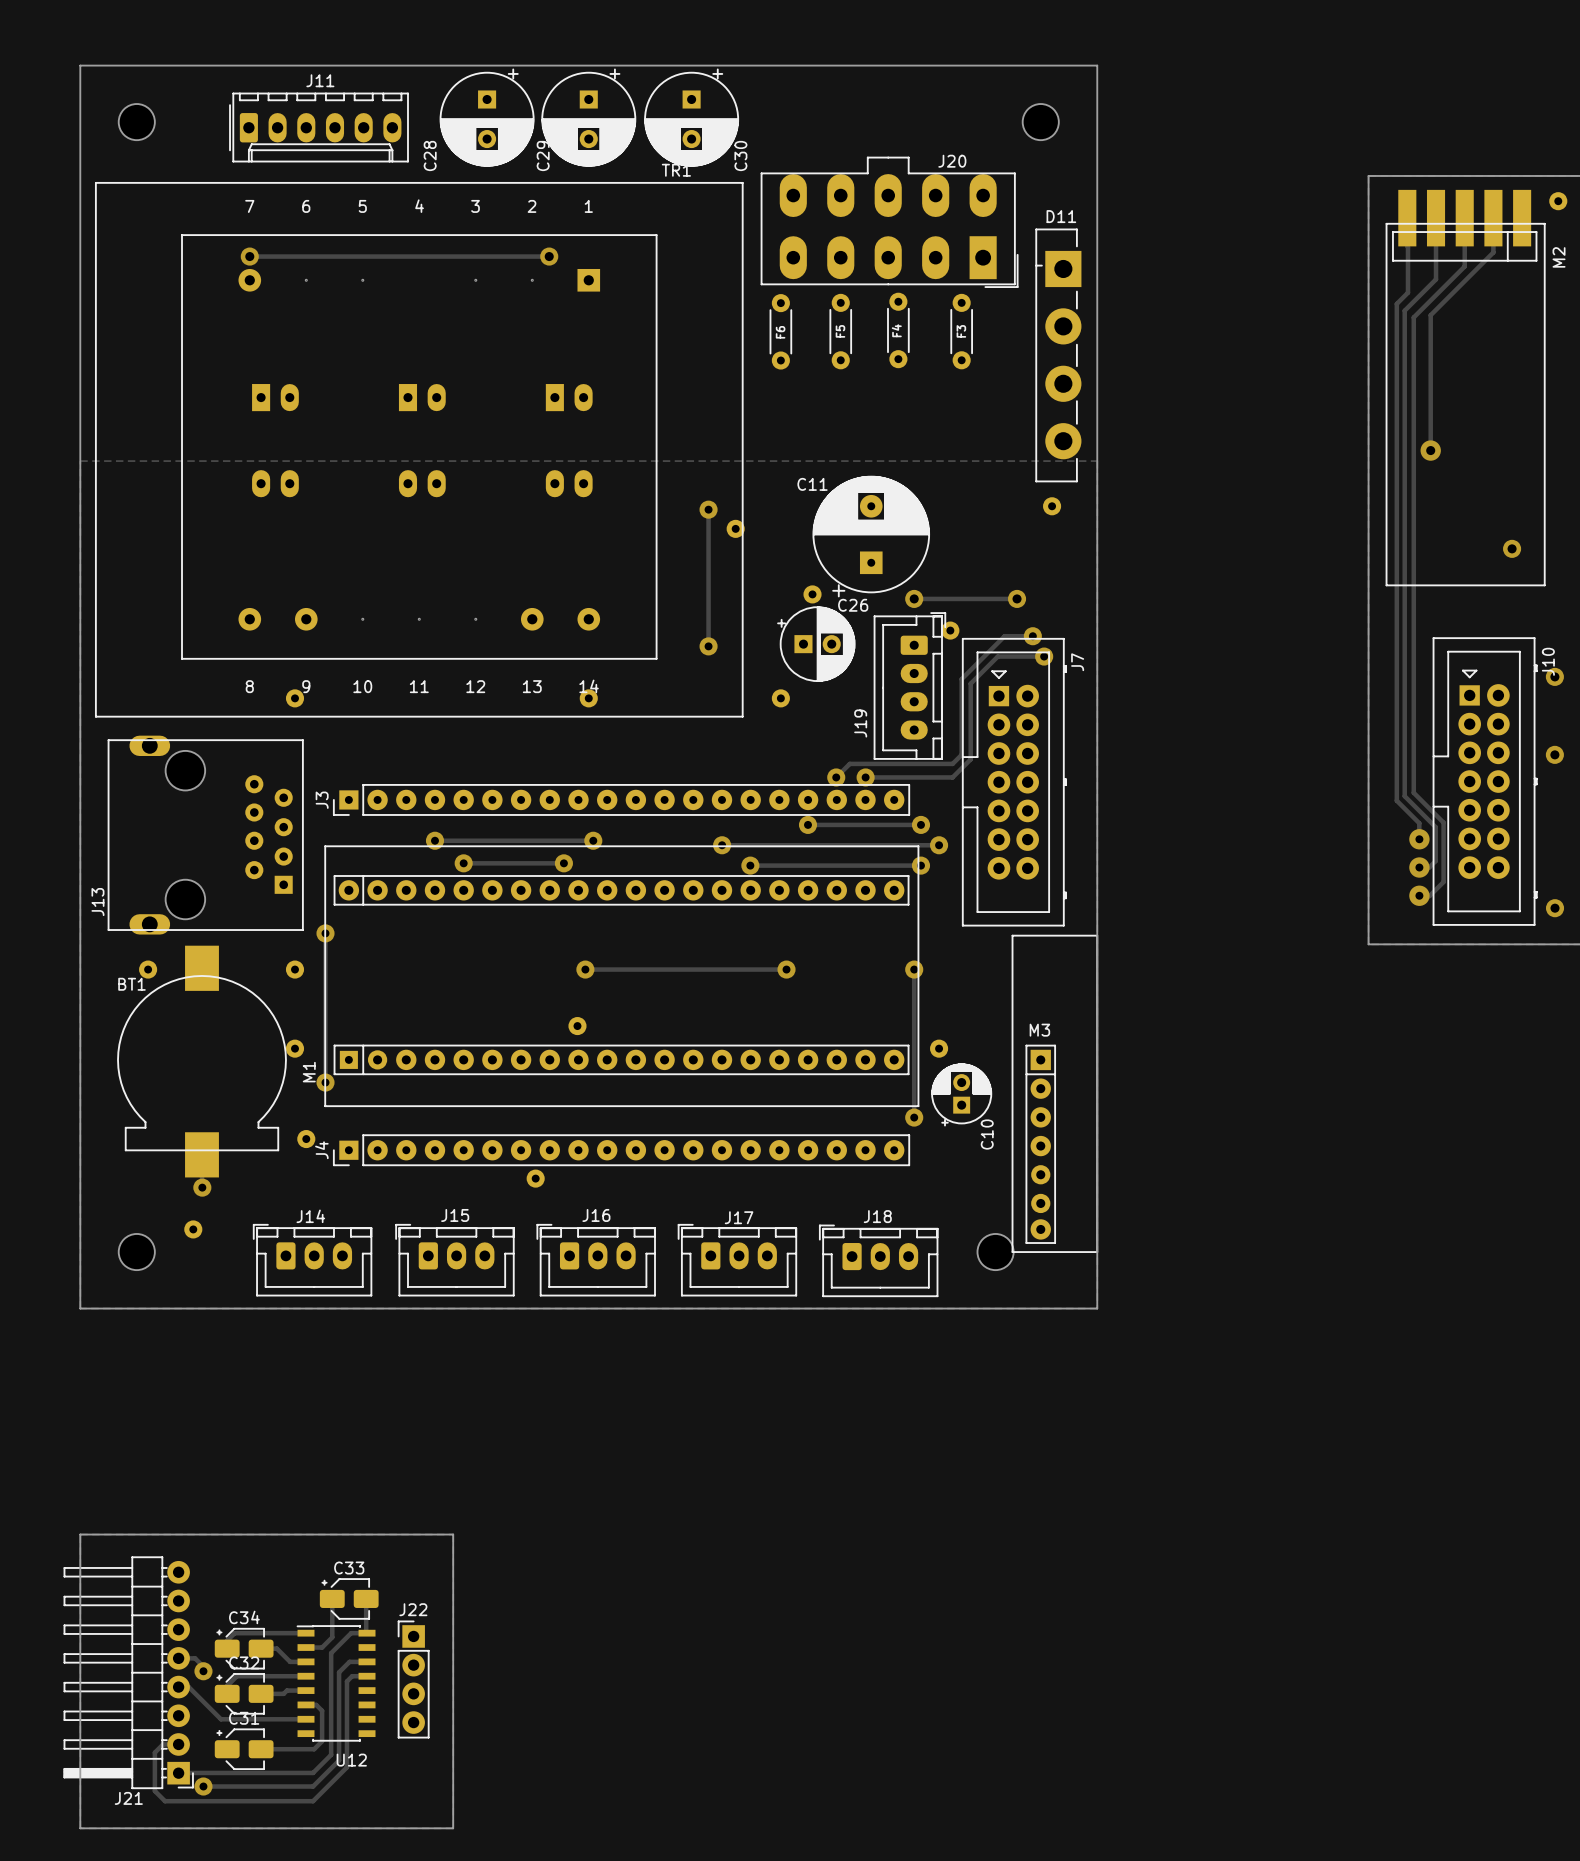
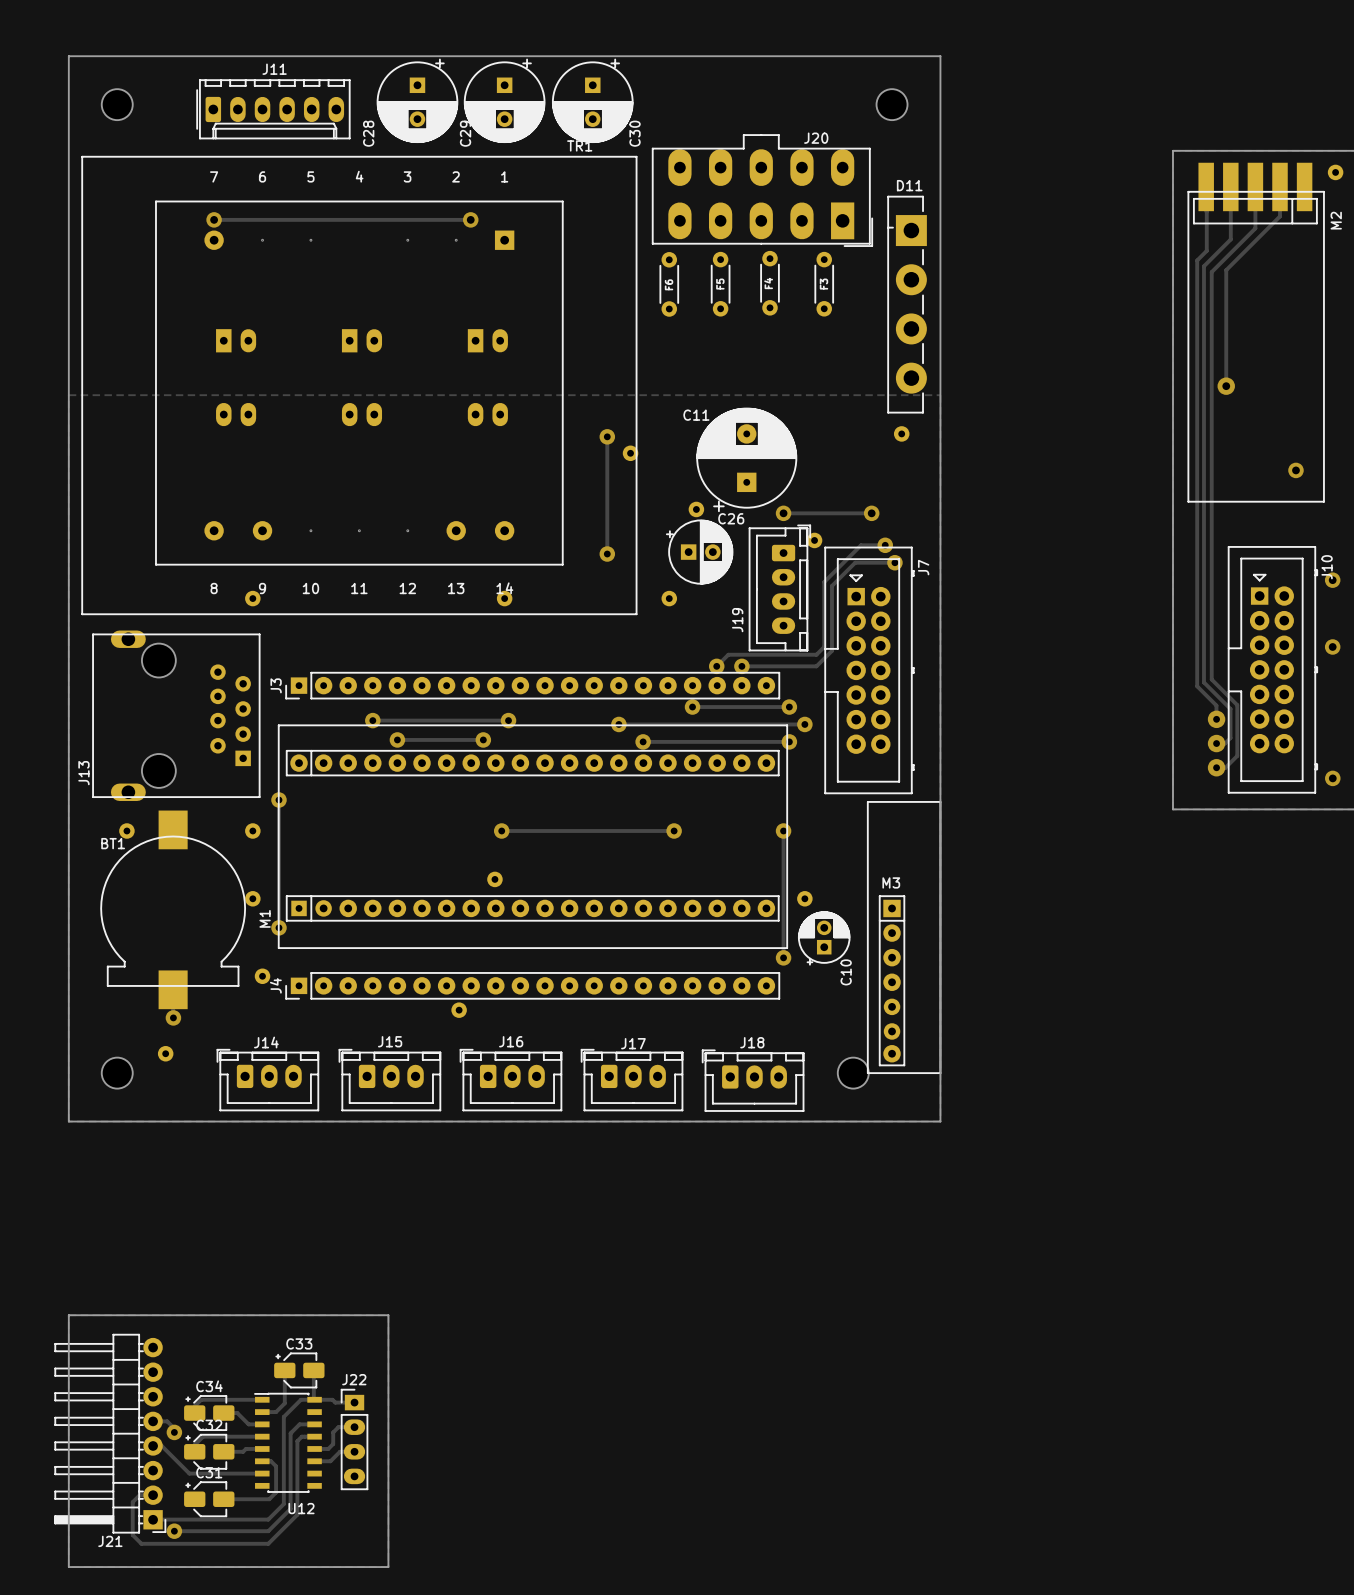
J22 footprint: [397, 1620, 430, 1739] -> [341, 1389, 368, 1490]
track: none -> (314, 1399) (354, 1402)
track: none -> (354, 1427) (338, 1427) (333, 1432) (333, 1444) (328, 1448) (314, 1448)
track: none -> (354, 1451) (340, 1451) (330, 1461) (314, 1461)

